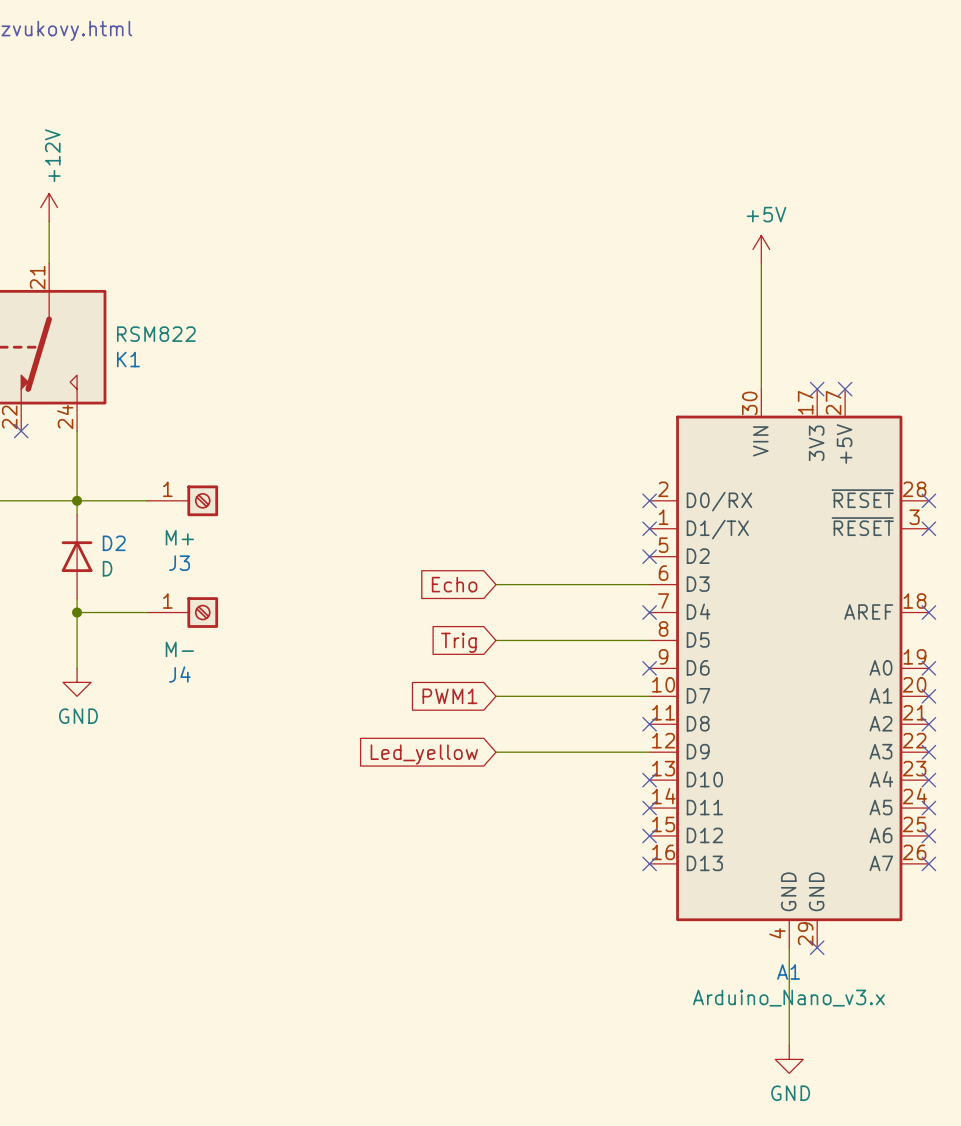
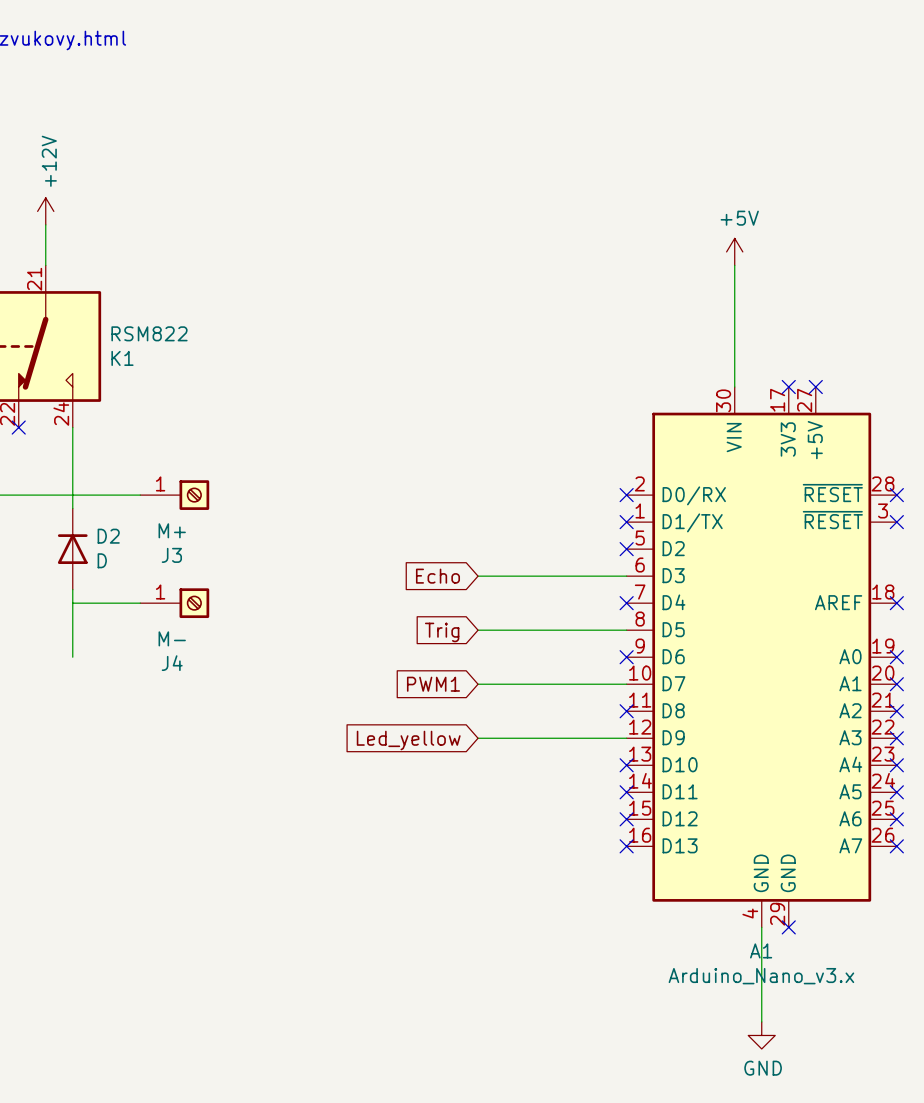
junction: (77, 500) -> none
junction: (77, 612) -> none
power symbol: GND (77, 682) -> none

